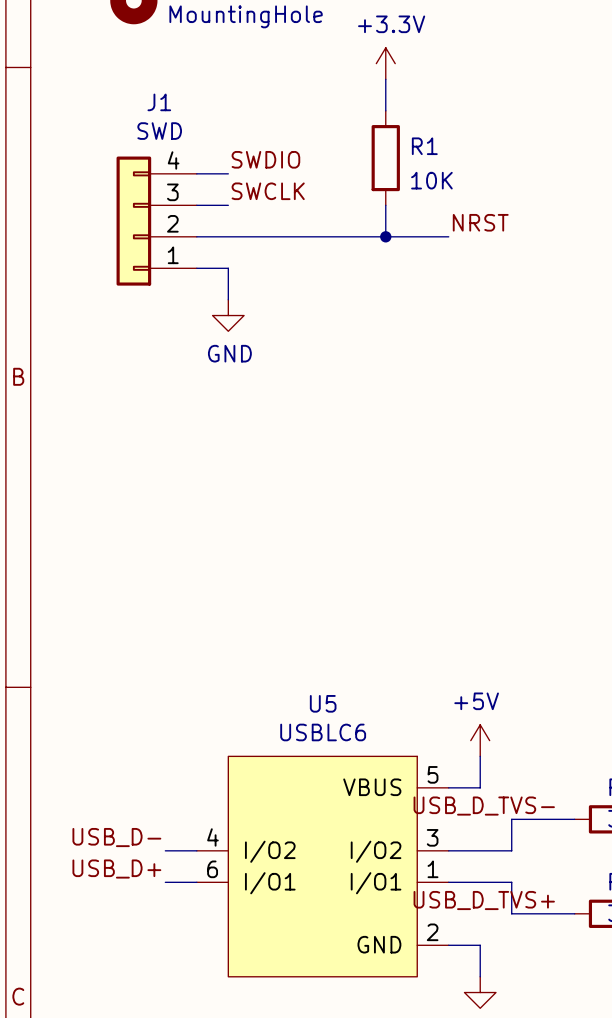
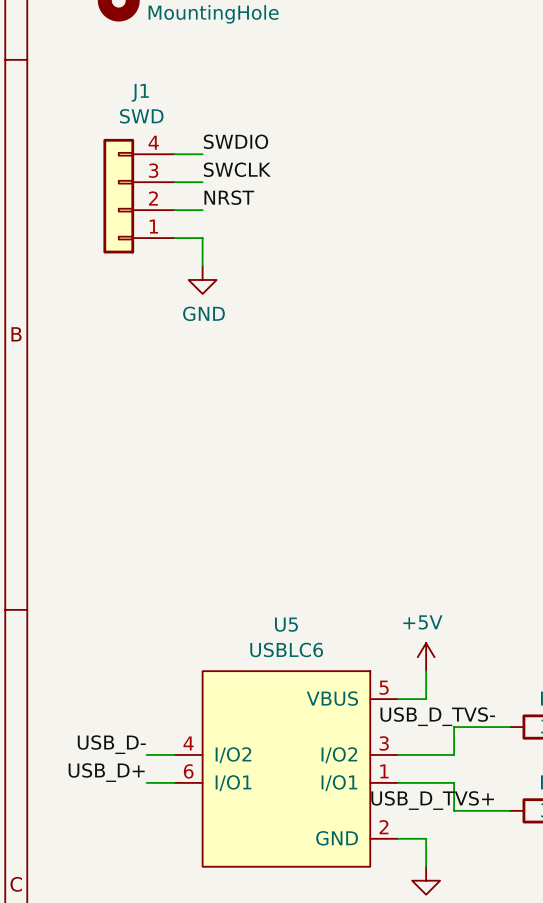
power symbol: +3.3V (385, 63) -> none
wire: (385, 79) (385, 110) -> none
R1: 10K (385, 158) -> none
wire: (385, 205) (385, 236) -> none
label position: NRST (480, 222) -> NRST (229, 197)
wire: (228, 236) (448, 236) -> none
junction: (385, 236) -> none

